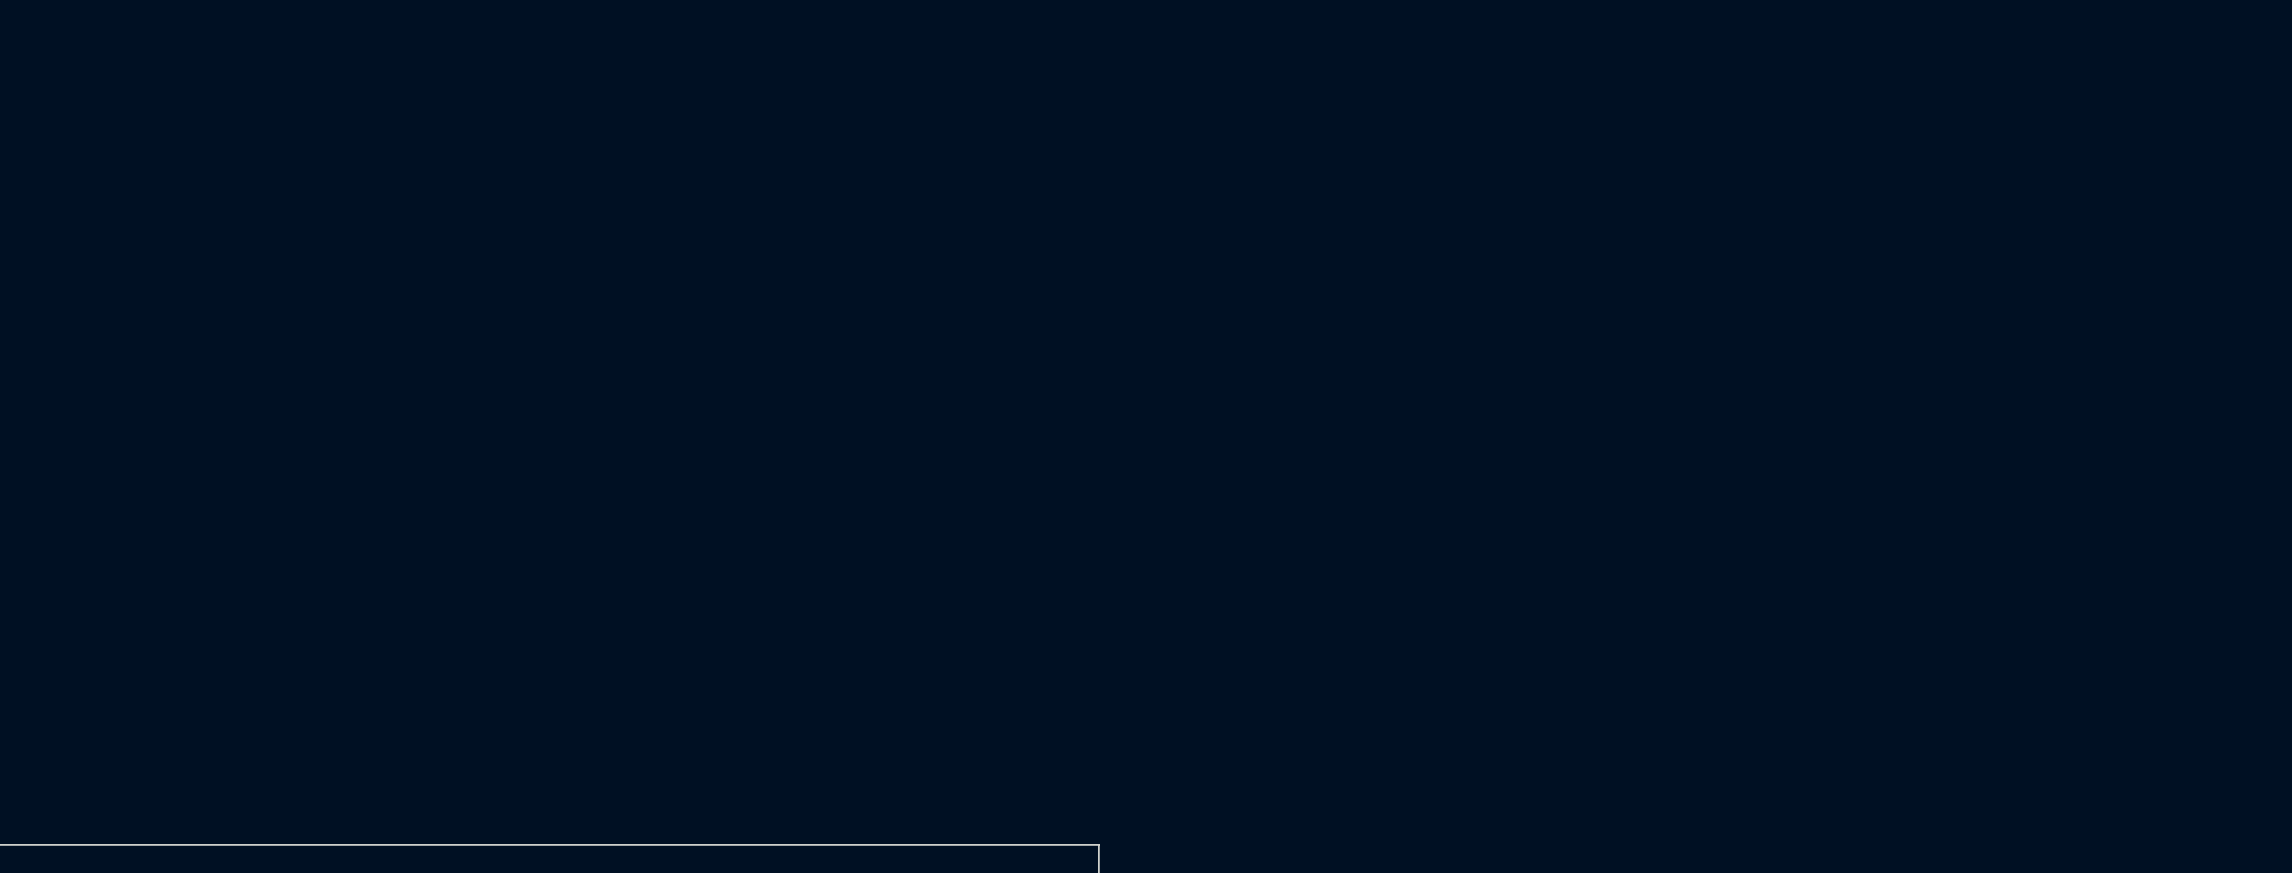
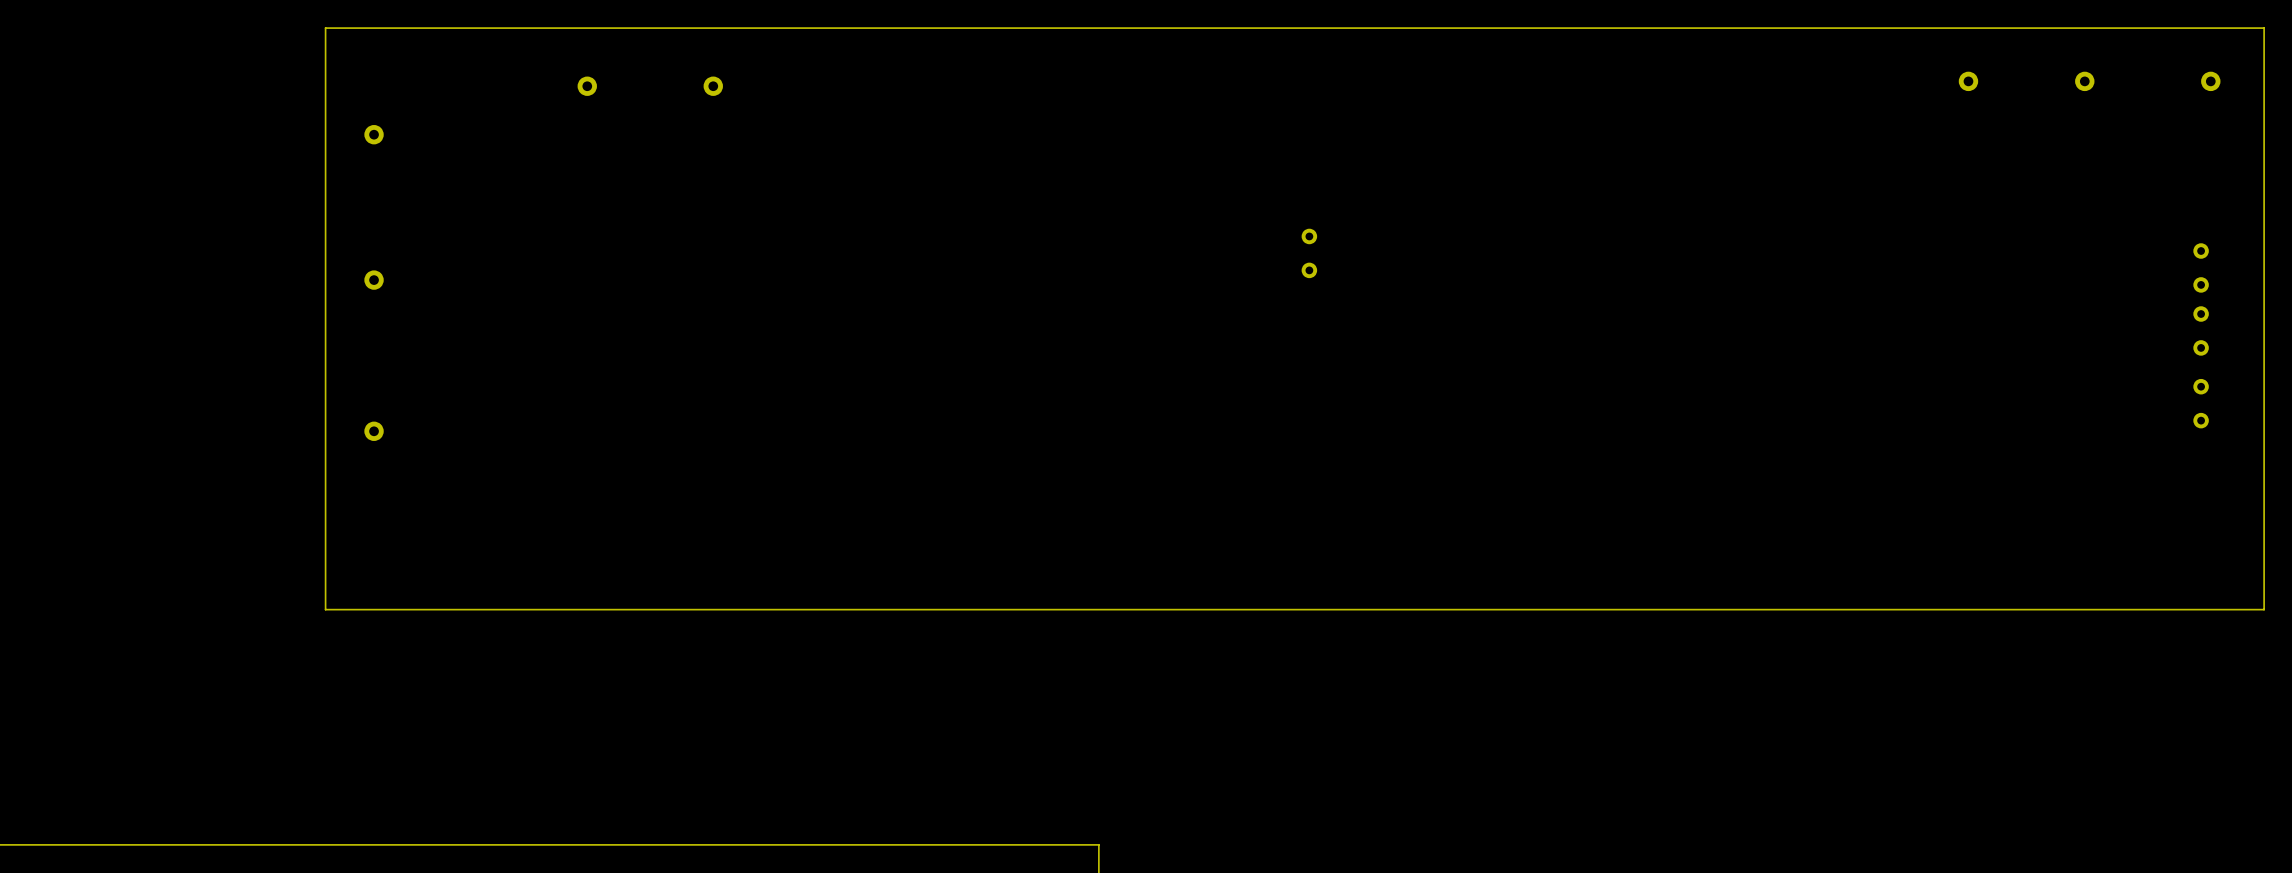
board edge: none -> (2264, 28) (325, 28) (325, 609) (2264, 609) (2264, 28)
part: none -> (1968, 81)
part: none -> (2084, 81)
part: none -> (2210, 81)
part: none -> (587, 86)
part: none -> (713, 86)
part: none -> (374, 134)
part: none -> (1309, 253)
part: none -> (2201, 267)
part: none -> (374, 280)
part: none -> (2201, 330)
part: none -> (2201, 403)
part: none -> (374, 431)

